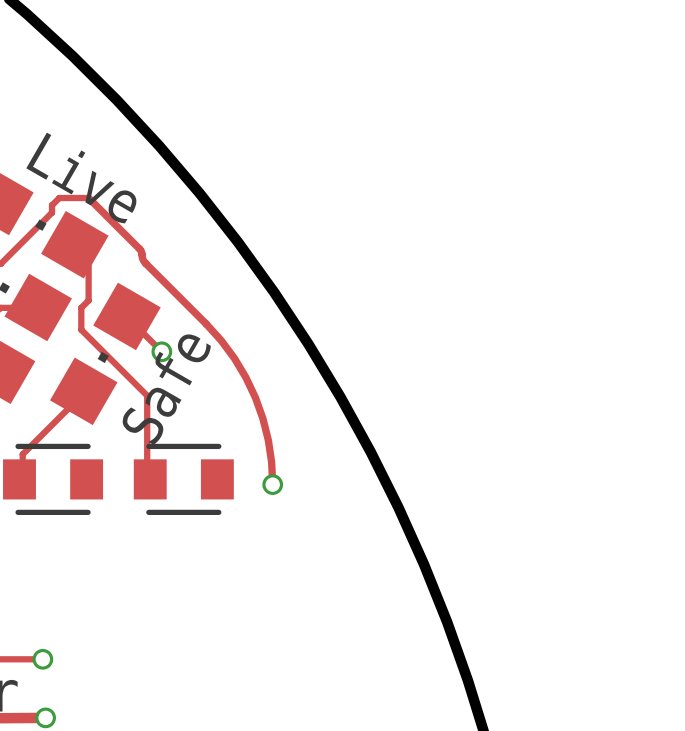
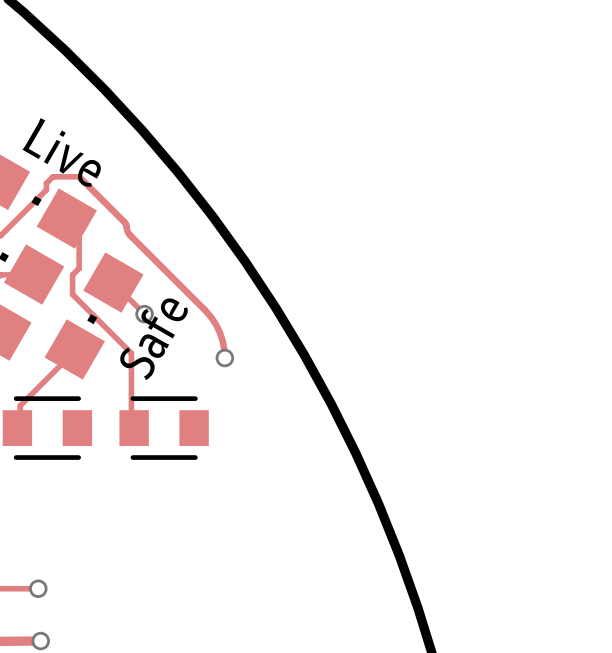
track: (206, 323) (234, 358) (255, 397) (268, 440) (272, 484) -> (184, 289) (215, 324) (222, 340) (224, 358)
via position: (272, 484) -> (224, 358)

